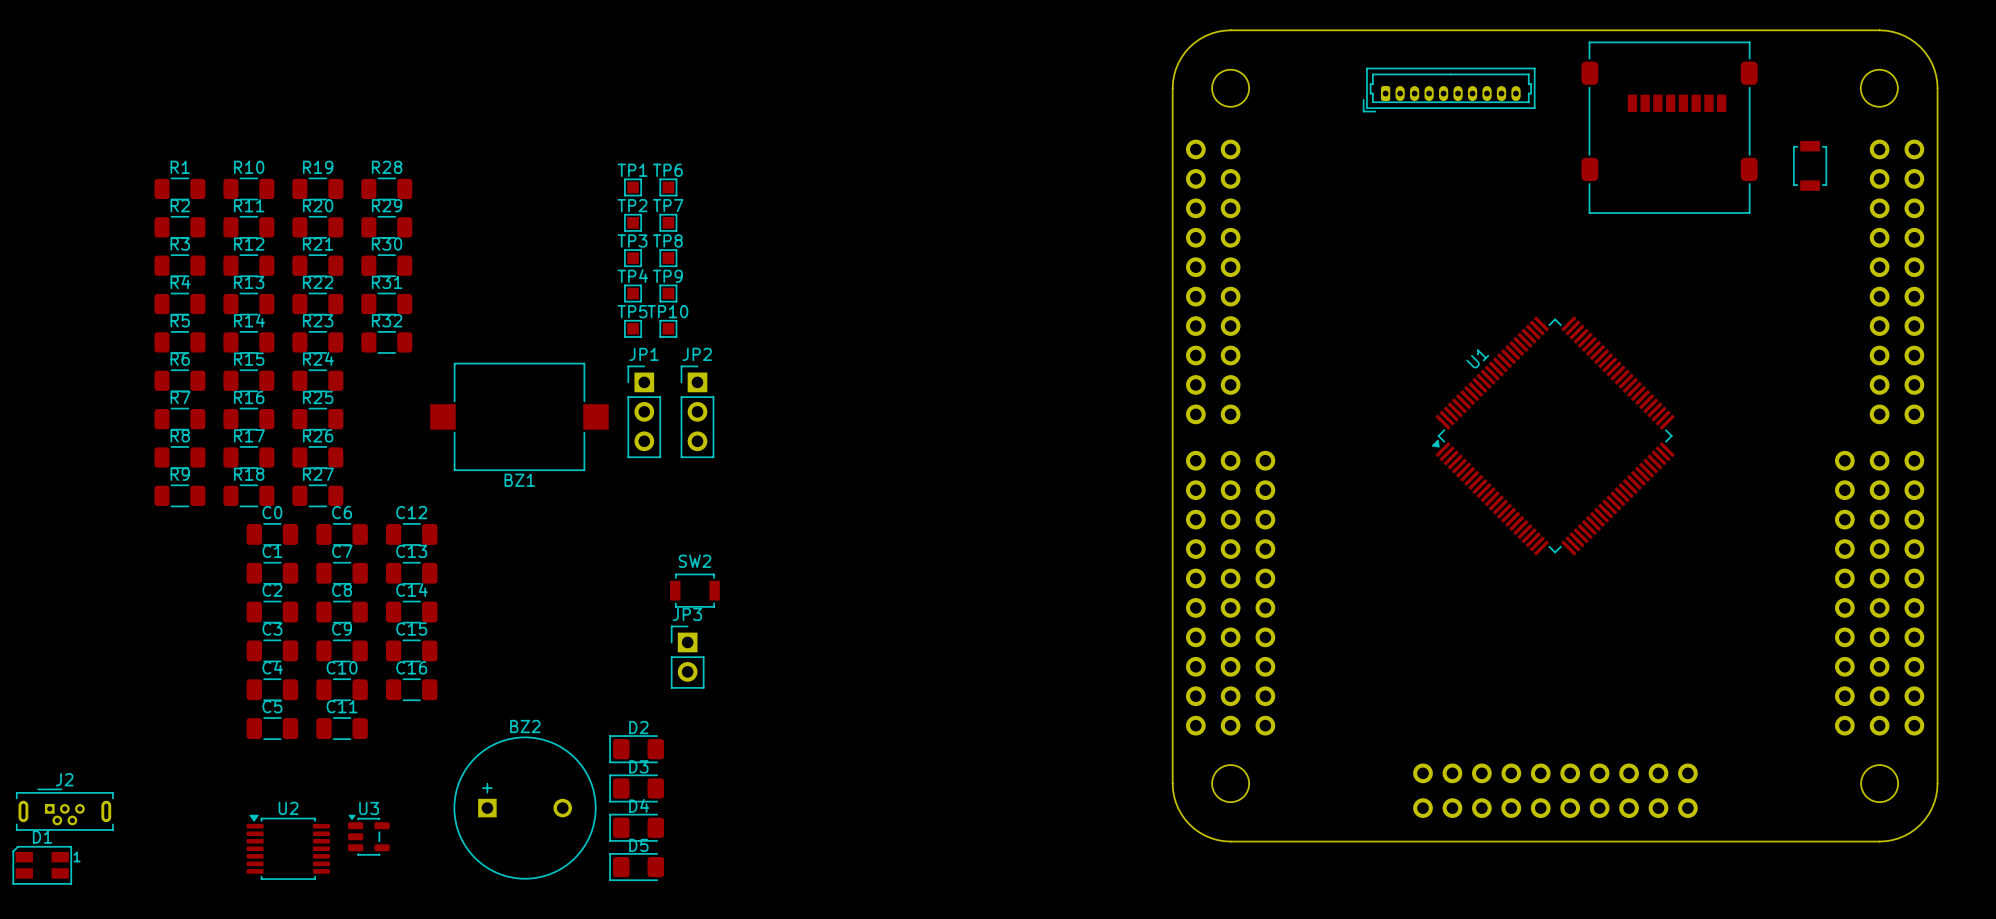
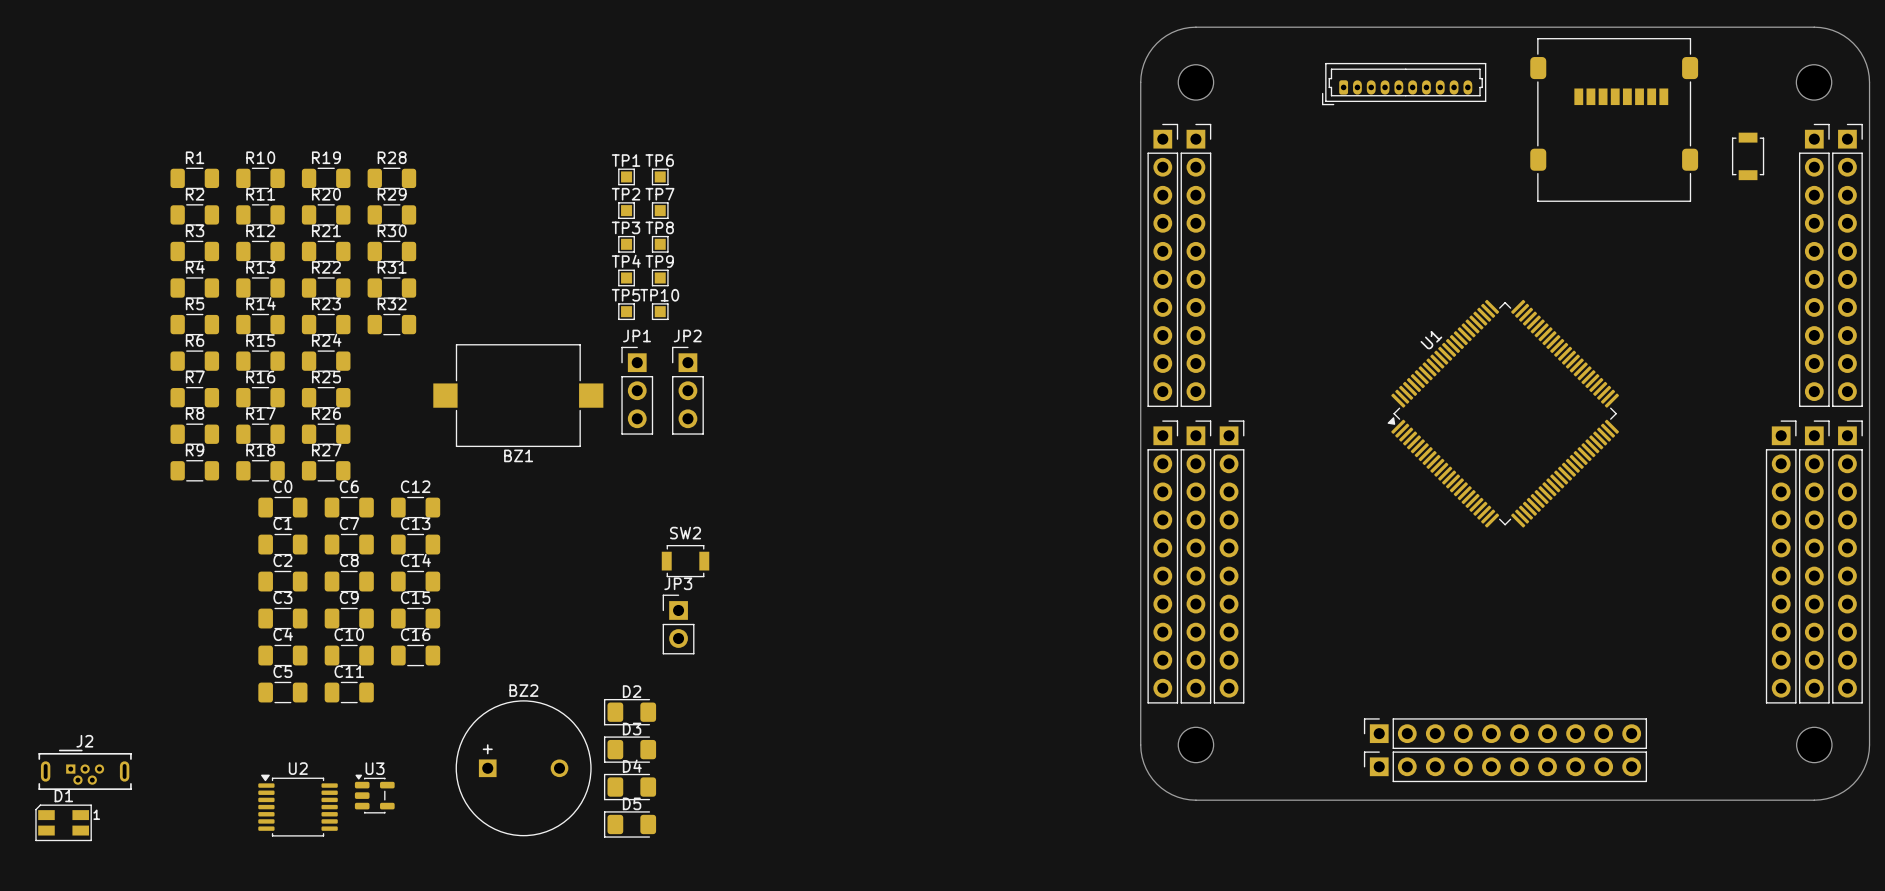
part: none -> (1162, 265)
part: none -> (1195, 265)
part: none -> (1814, 265)
part: none -> (1847, 265)
part: (1555, 435) -> none
part: none -> (1162, 561)
part: none -> (1195, 561)
part: none -> (1229, 561)
part: none -> (1781, 561)
part: none -> (1814, 561)
part: none -> (1847, 561)
part: none -> (1505, 733)
part: none -> (1505, 766)

